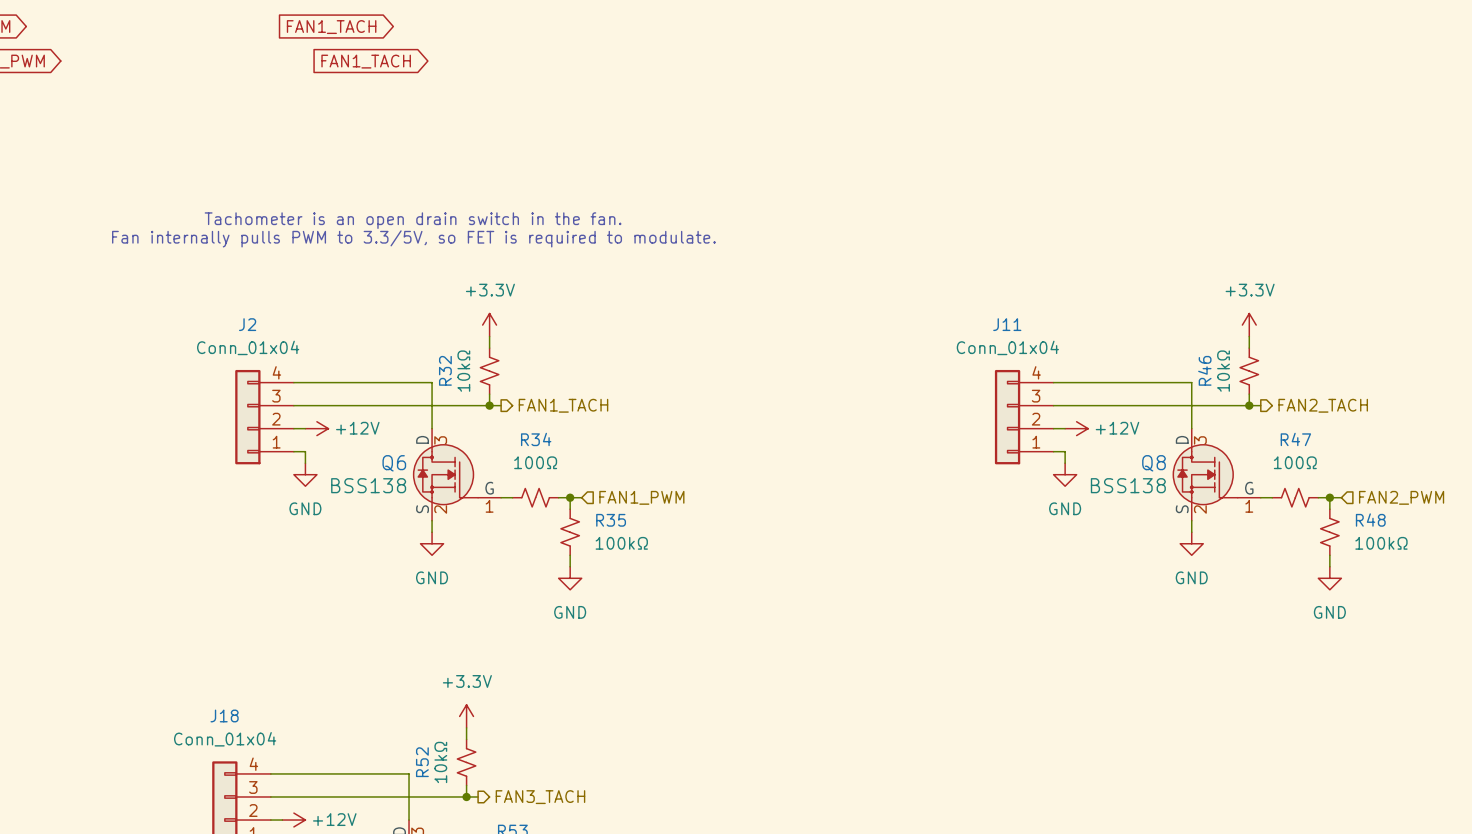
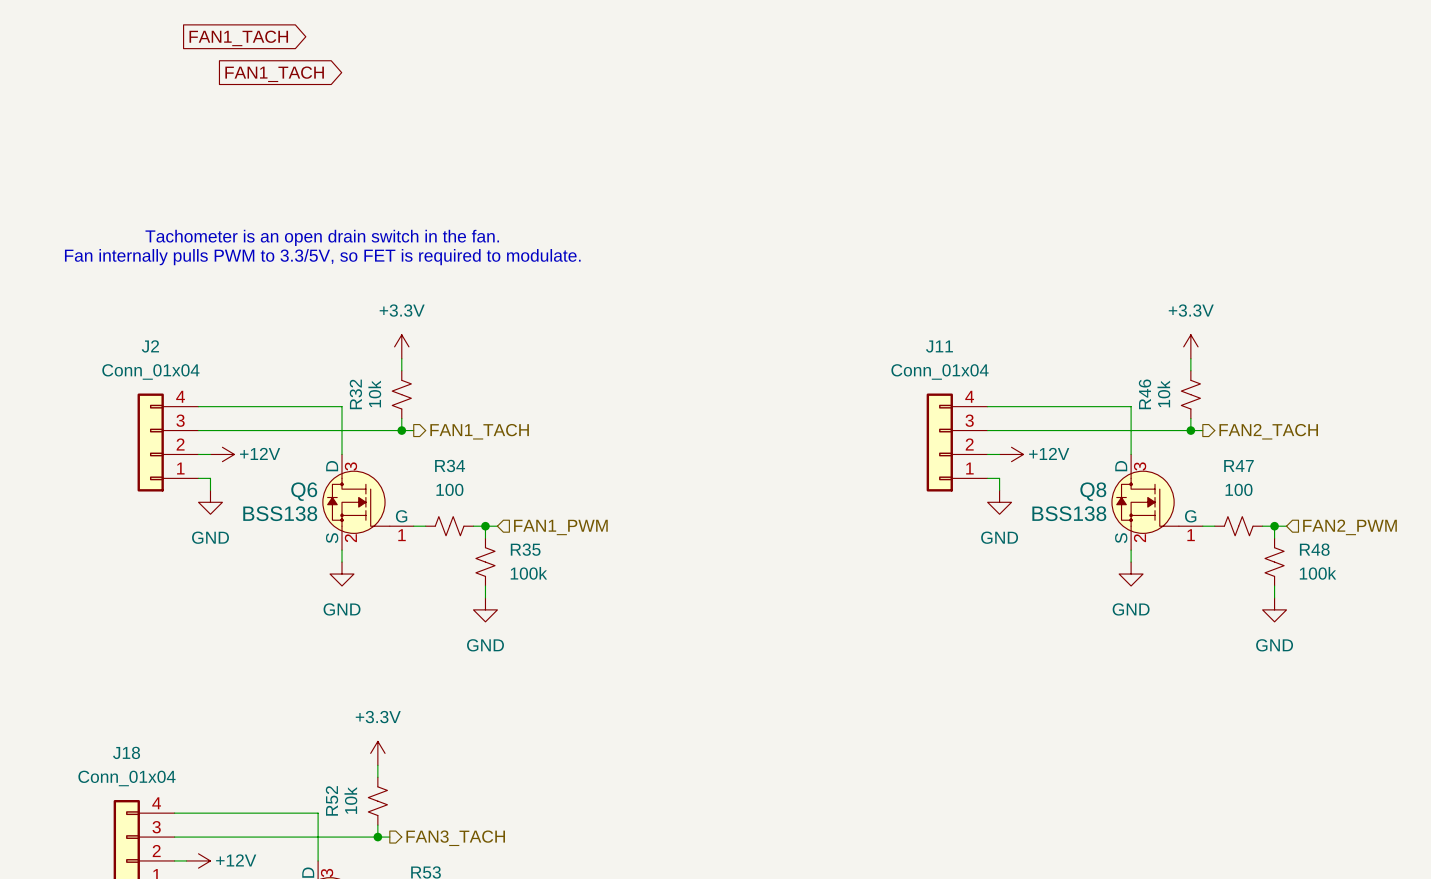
R32 value: 10kΩ (463, 371) -> 10k (374, 394)
R46 value: 10kΩ (1223, 371) -> 10k (1163, 394)
R34 value: 100Ω (535, 462) -> 100 (449, 489)
R47 value: 100Ω (1295, 462) -> 100 (1239, 489)
R35 value: 100kΩ (621, 543) -> 100k (528, 573)
R48 value: 100kΩ (1381, 543) -> 100k (1317, 573)
R52 value: 10kΩ (440, 762) -> 10k (350, 800)

